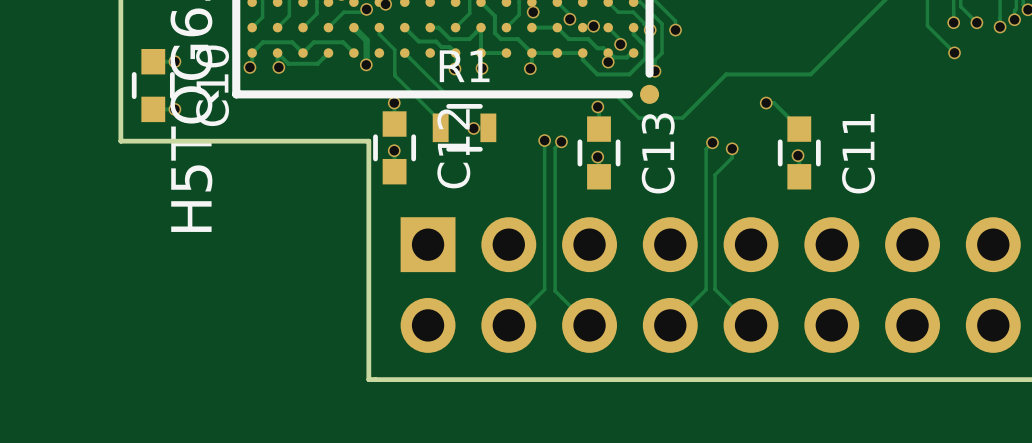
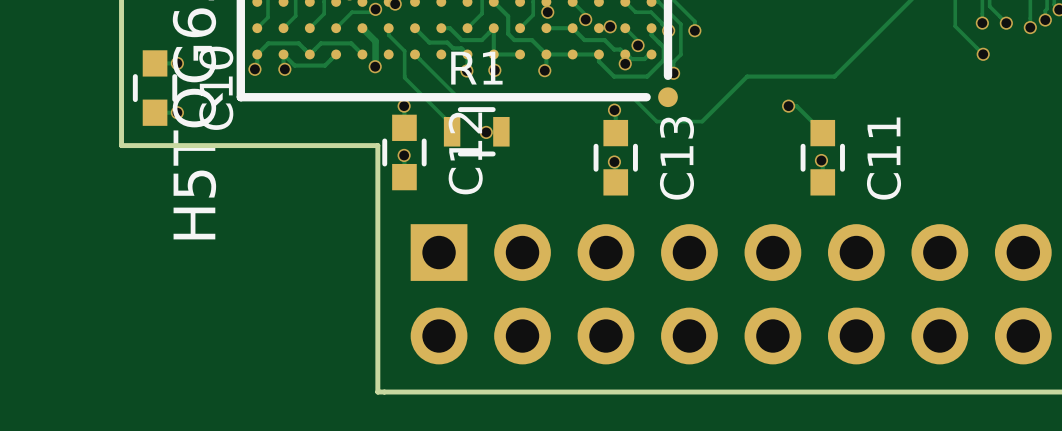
track: (544, 140) (544, 289) (508, 325) -> none
via: (544, 140) -> none
track: (561, 141) (555, 148) (555, 290) (589, 325) -> none
via: (561, 141) -> none
track: (712, 142) (706, 149) (706, 289) (670, 325) -> none
via: (712, 142) -> none
track: (732, 148) (732, 157) (715, 174) (715, 289) (751, 325) -> none
via: (732, 148) -> none

